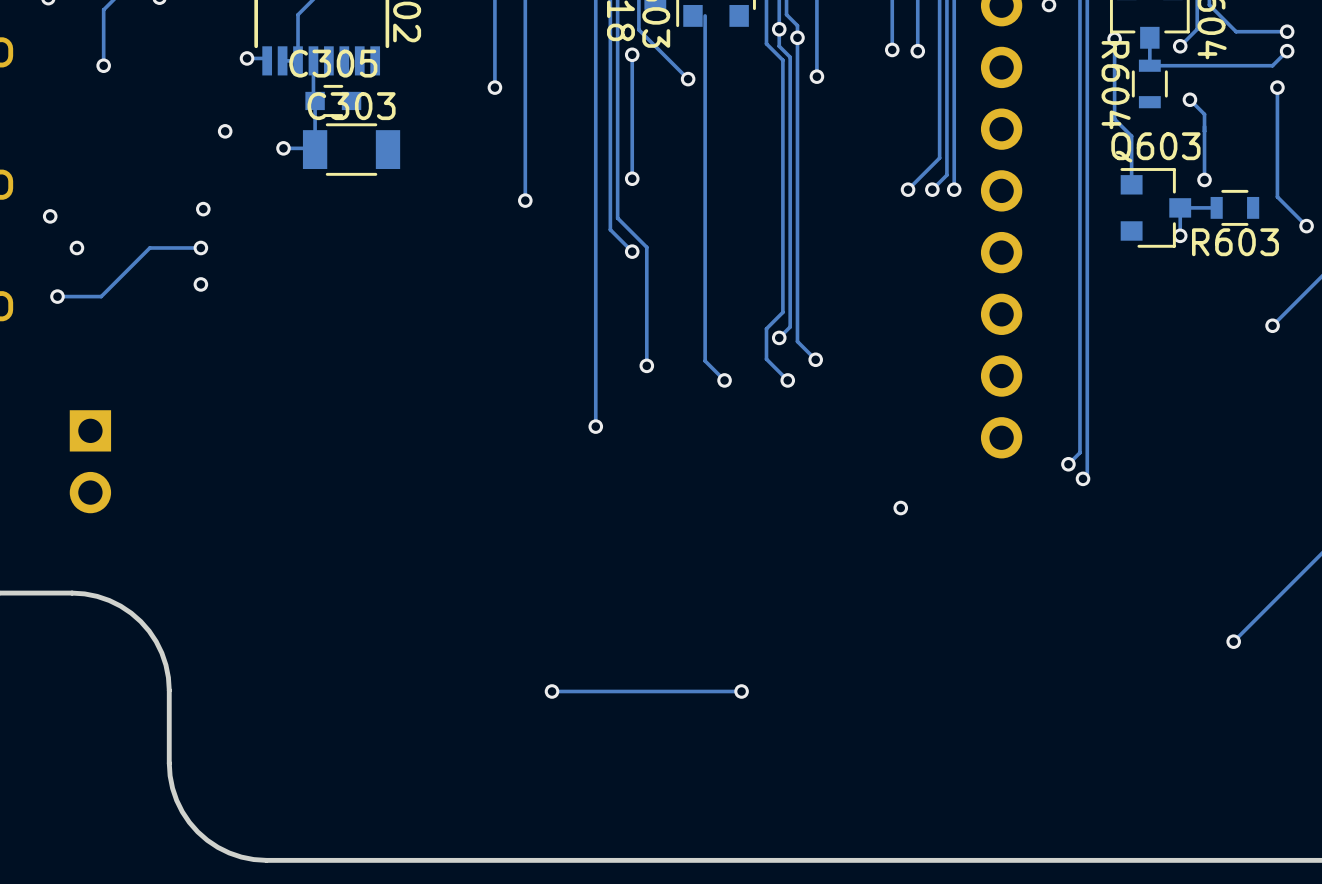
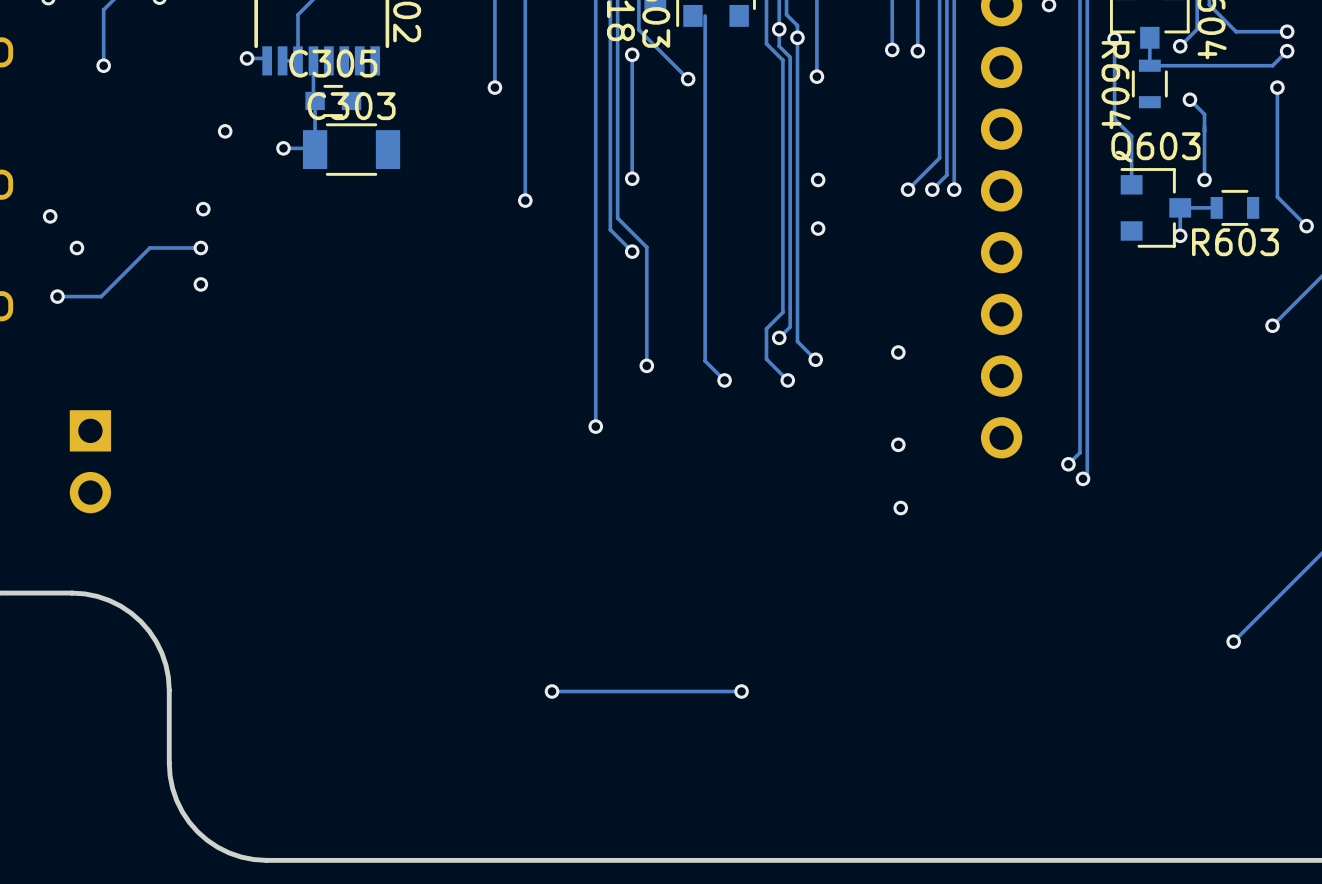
via: none -> (818, 179)
via: none -> (818, 228)
via: none -> (898, 352)
via: none -> (898, 444)

